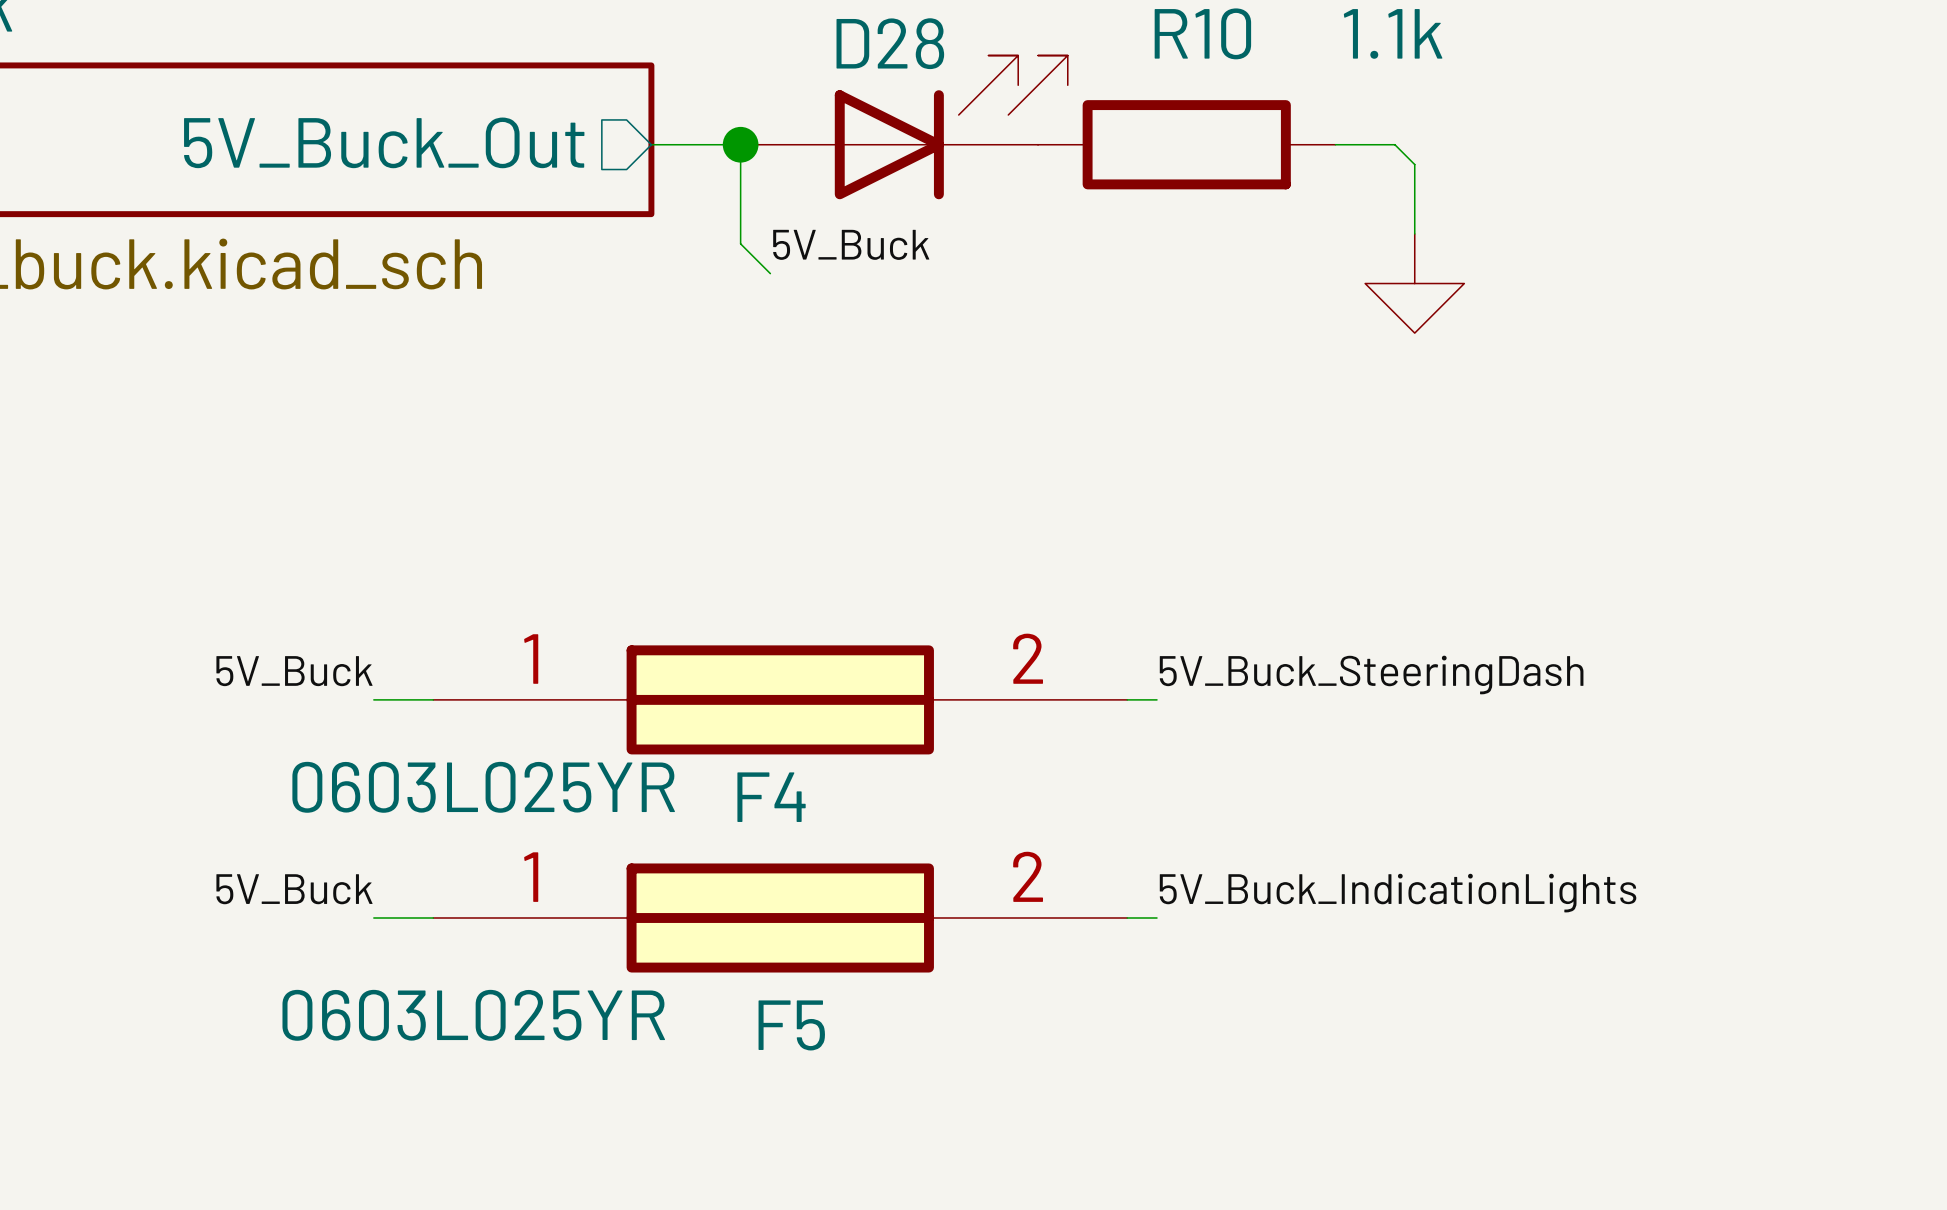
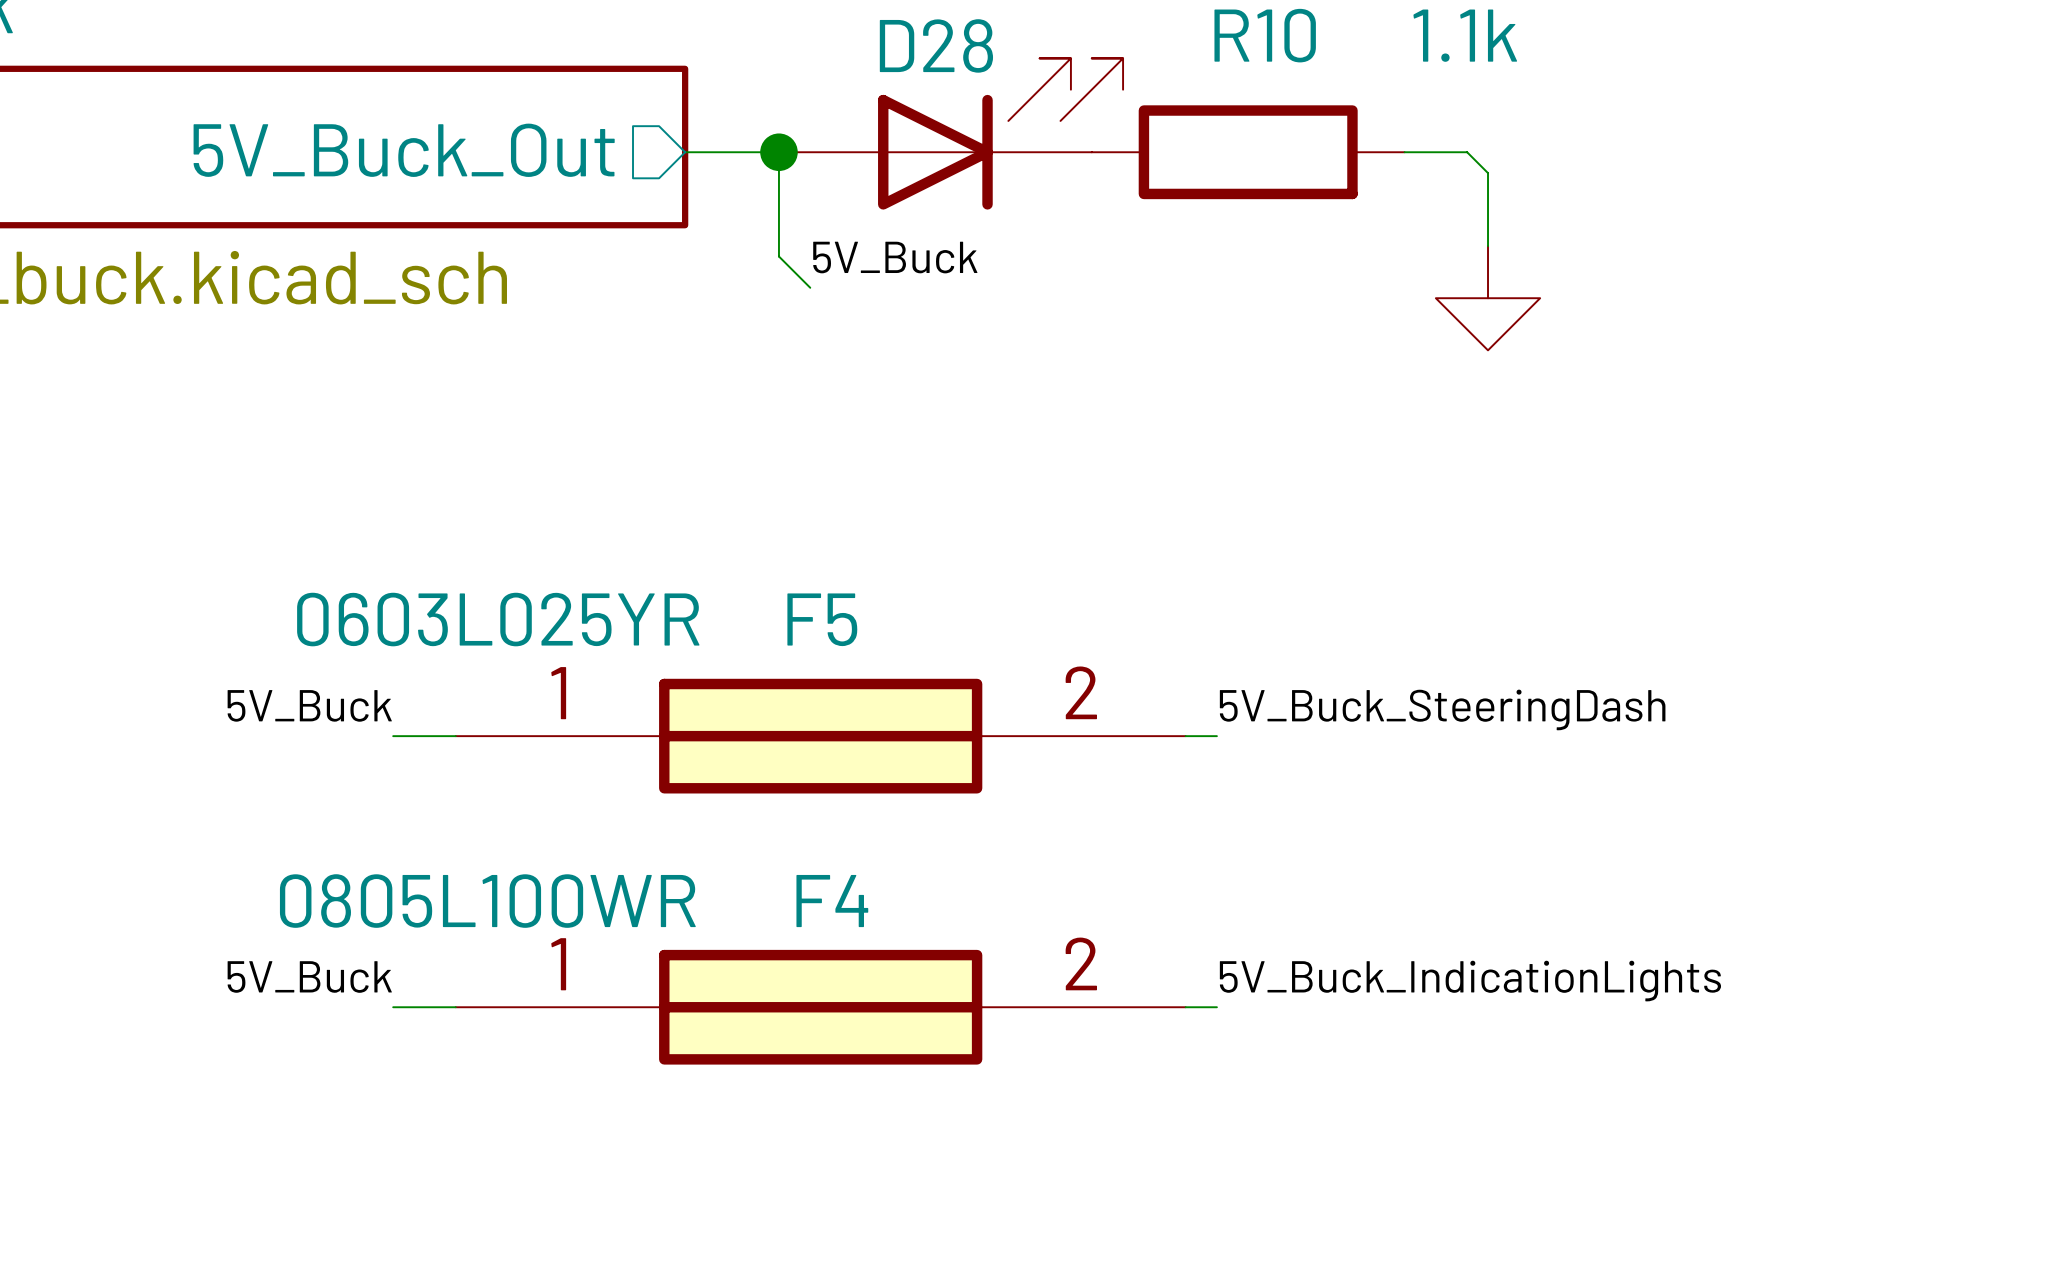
F4 value: 0603L025YR (483, 787) -> 0805L100WR (487, 901)
F4 name position: F4 (771, 797) -> F4 (832, 901)
label position: 5V_Buck (294, 889) -> 5V_Buck (309, 977)
label position: 5V_Buck_IndicationLights (1398, 893) -> 5V_Buck_IndicationLights (1470, 981)
wire: (373, 917) (433, 917) -> (393, 1007) (455, 1007)
F4 position: (780, 917) -> (820, 1007)
wire: (1127, 917) (1156, 917) -> (1185, 1007) (1216, 1007)
F5 value position: 0603L025YR (473, 1015) -> 0603L025YR (498, 619)
F5 name position: F5 (791, 1025) -> F5 (822, 619)

